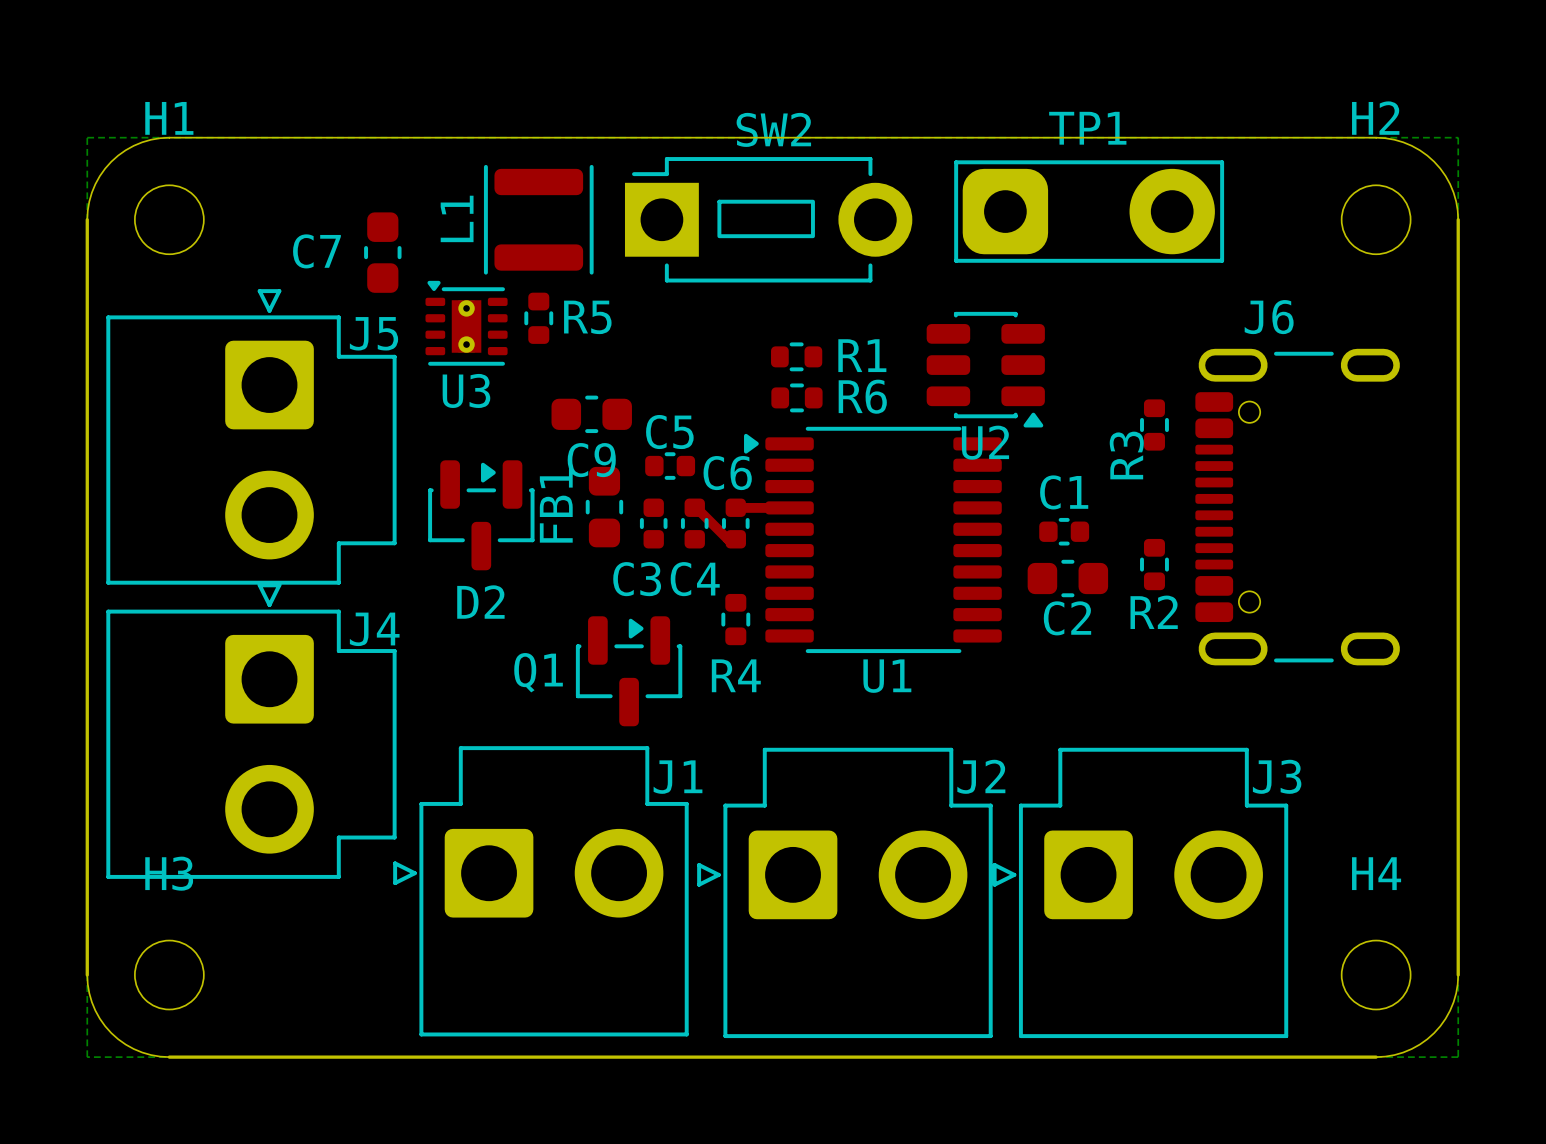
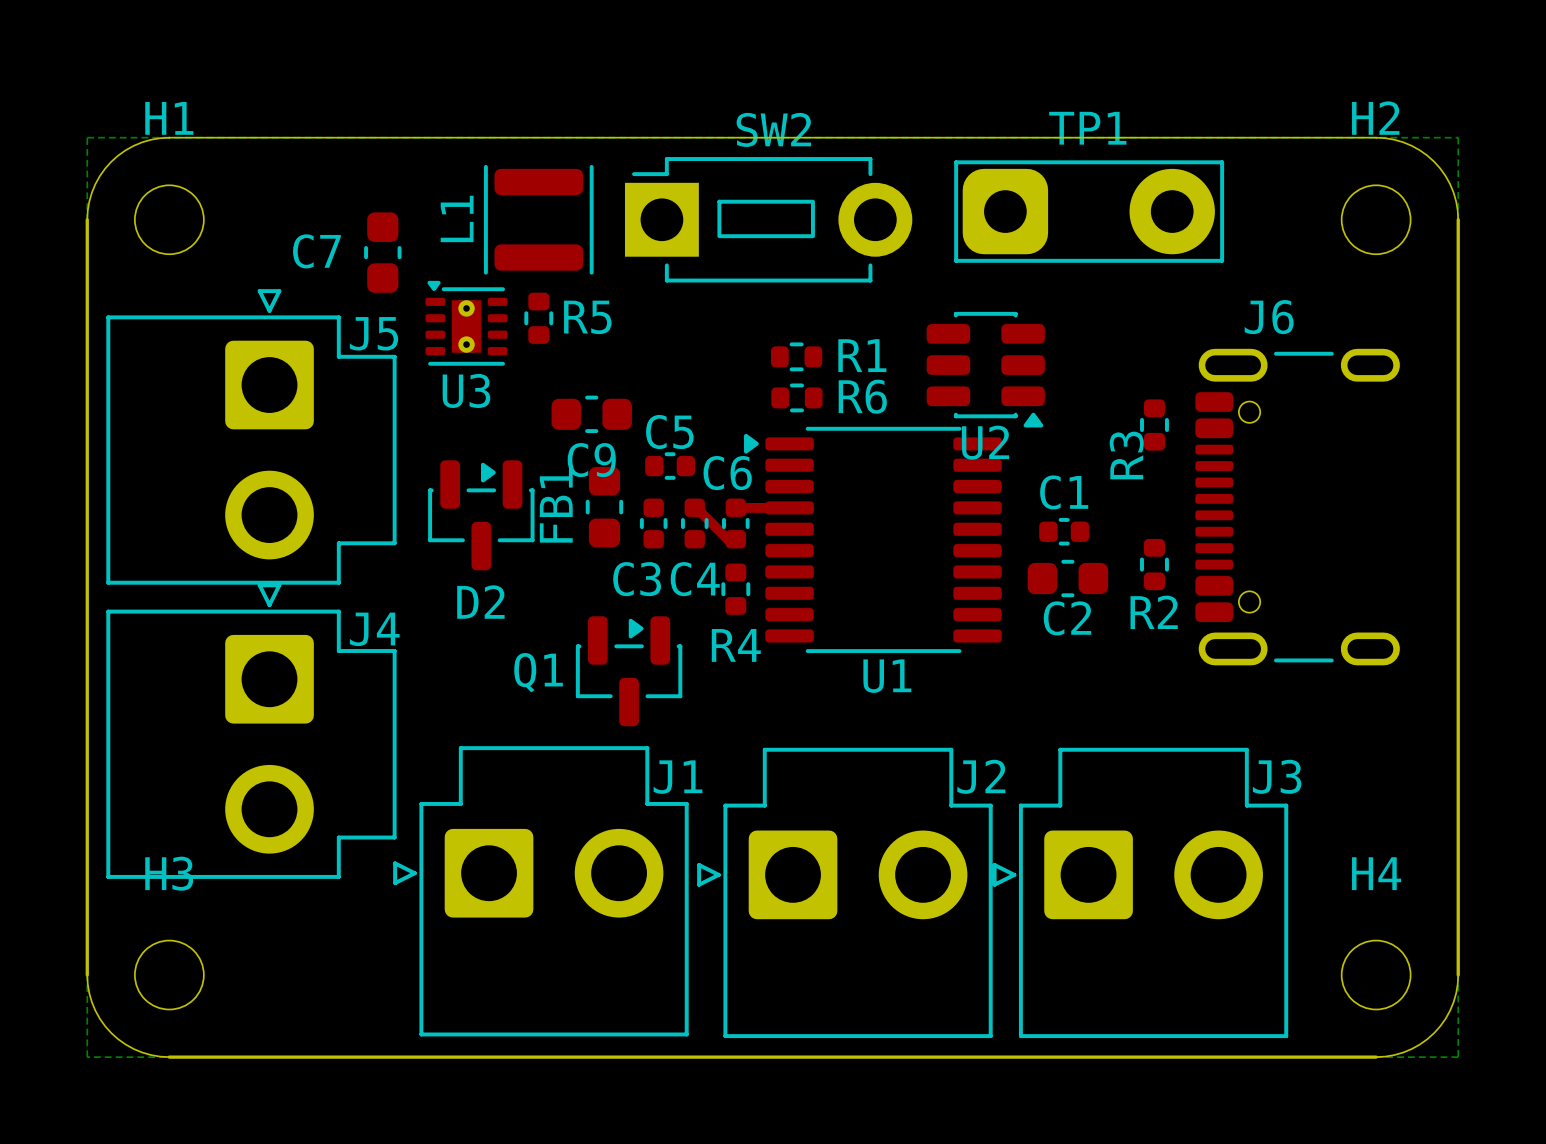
R4 position: (735, 619) -> (735, 589)

